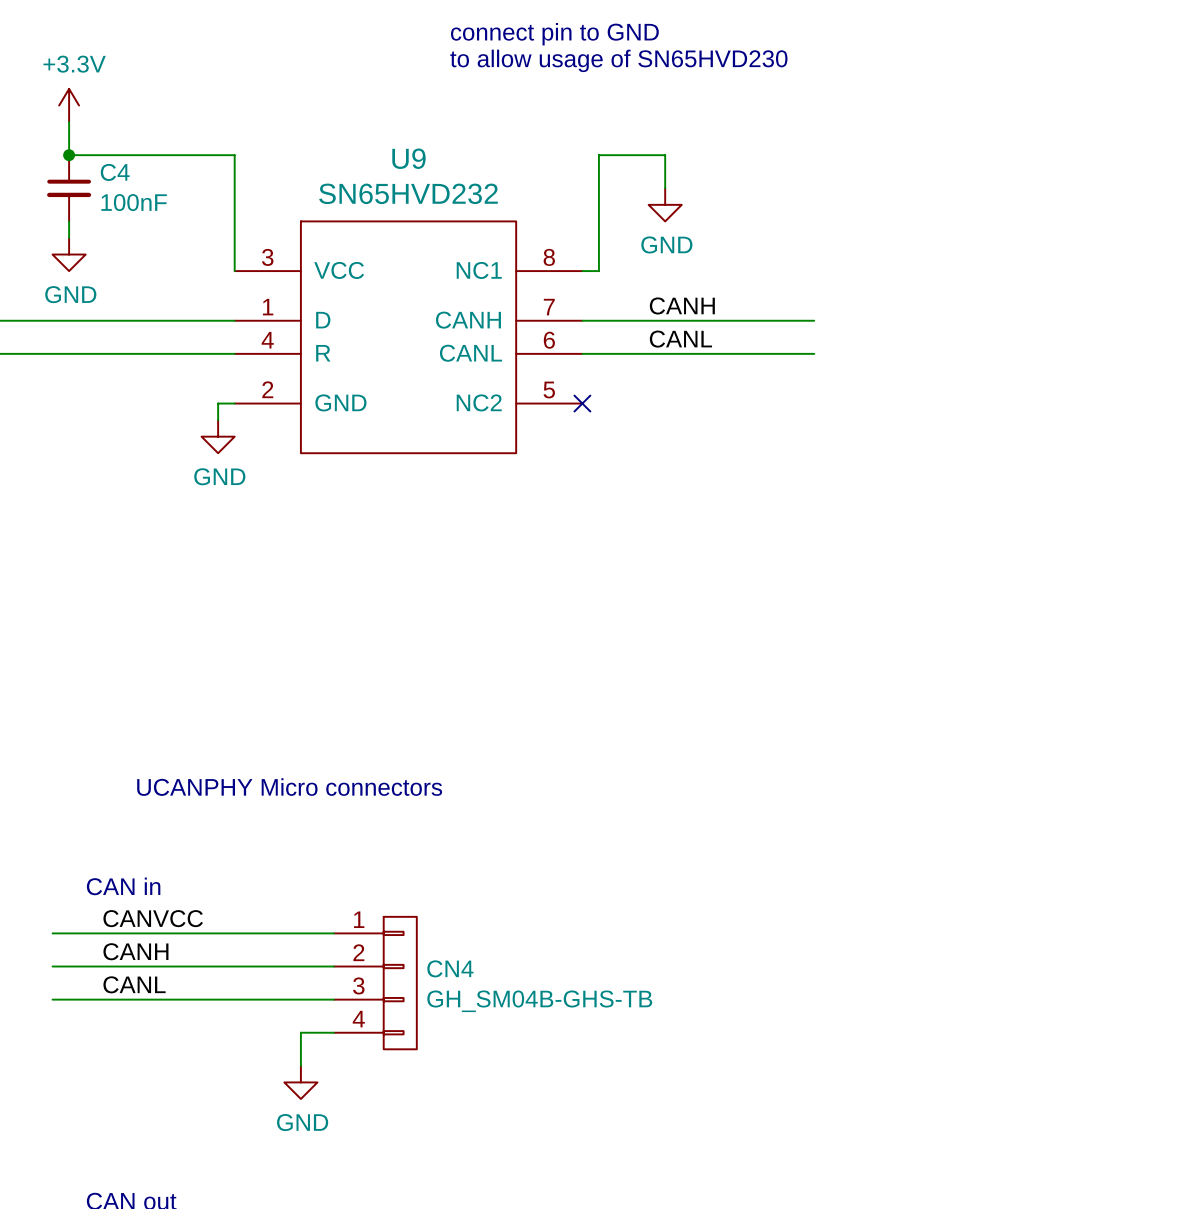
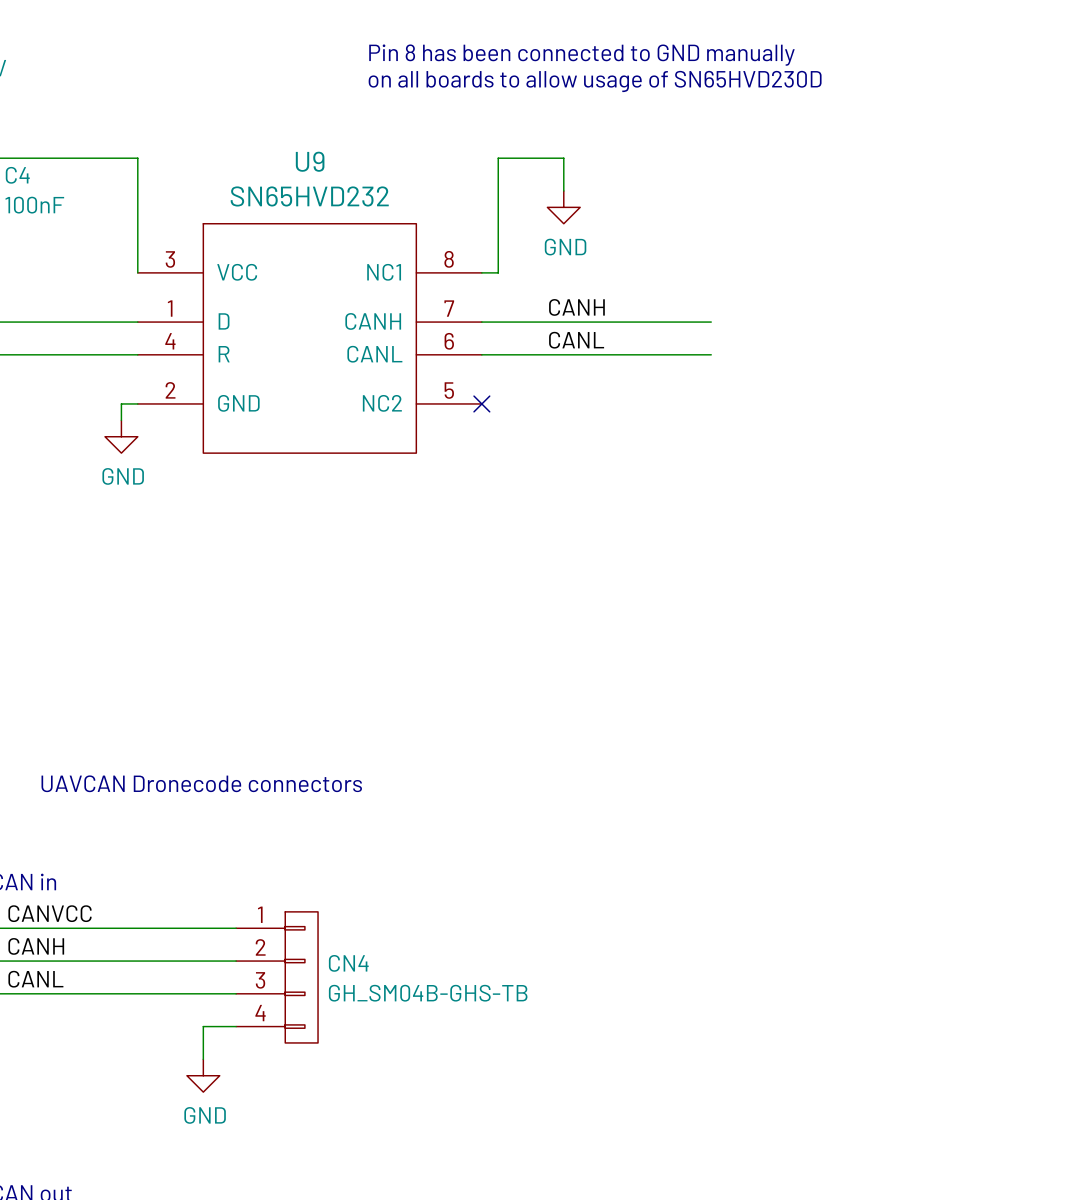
text: connect pin to GND (554, 34) -> none
text: none -> Pin 8 has been connected to GND manually (581, 55)
text: to allow usage of SN65HVD230 (618, 60) -> on all boards to allow usage of SN65HVD230D (595, 81)
text: UCANPHY Micro connectors (289, 787) -> UAVCAN Dronecode connectors (201, 783)

